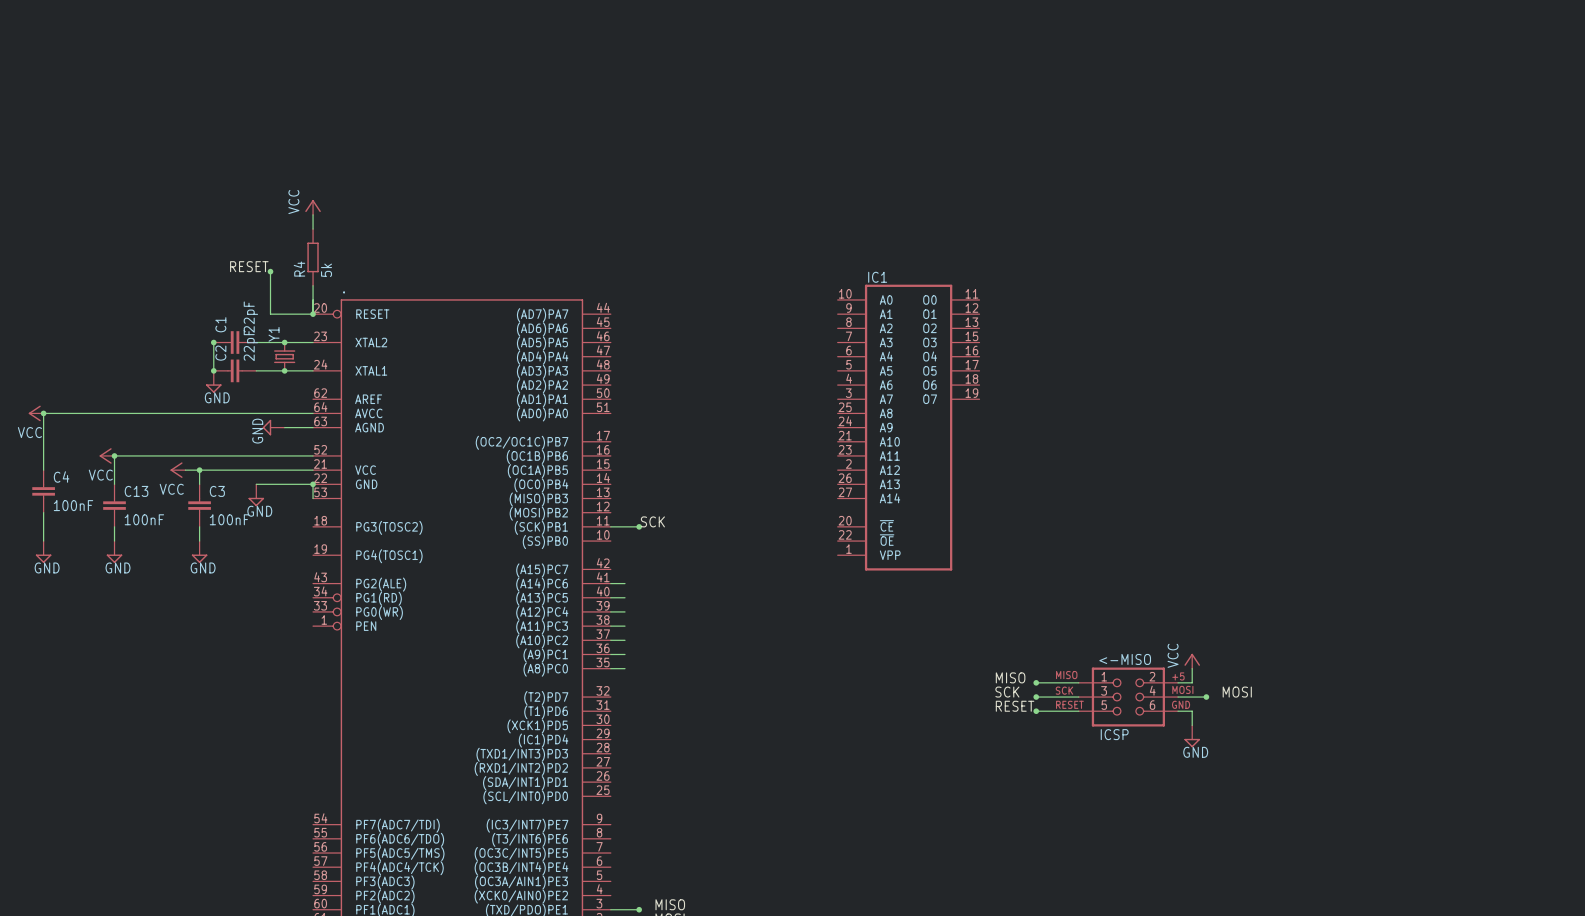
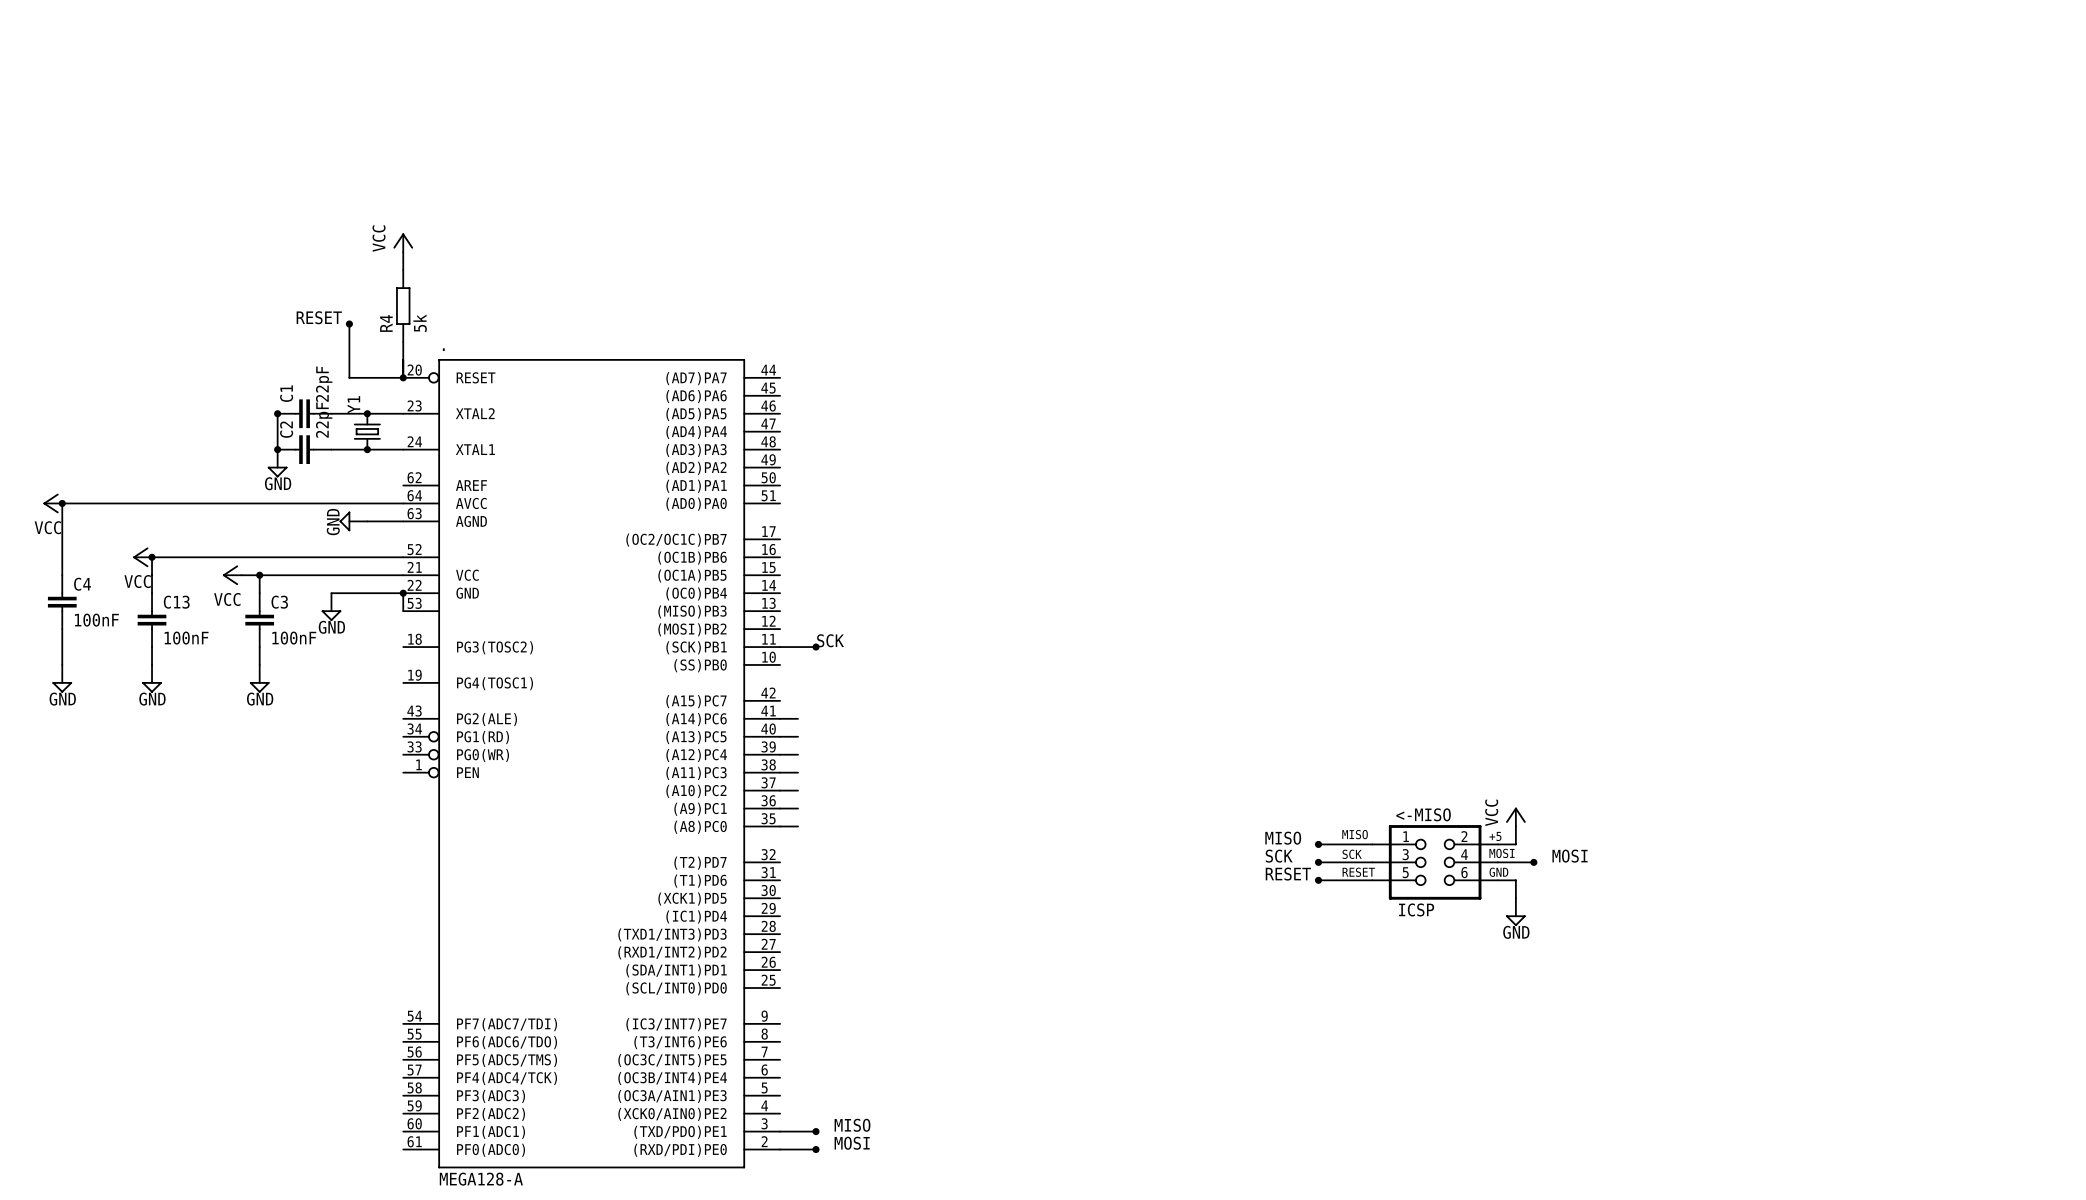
IC1: (908, 427) -> none

